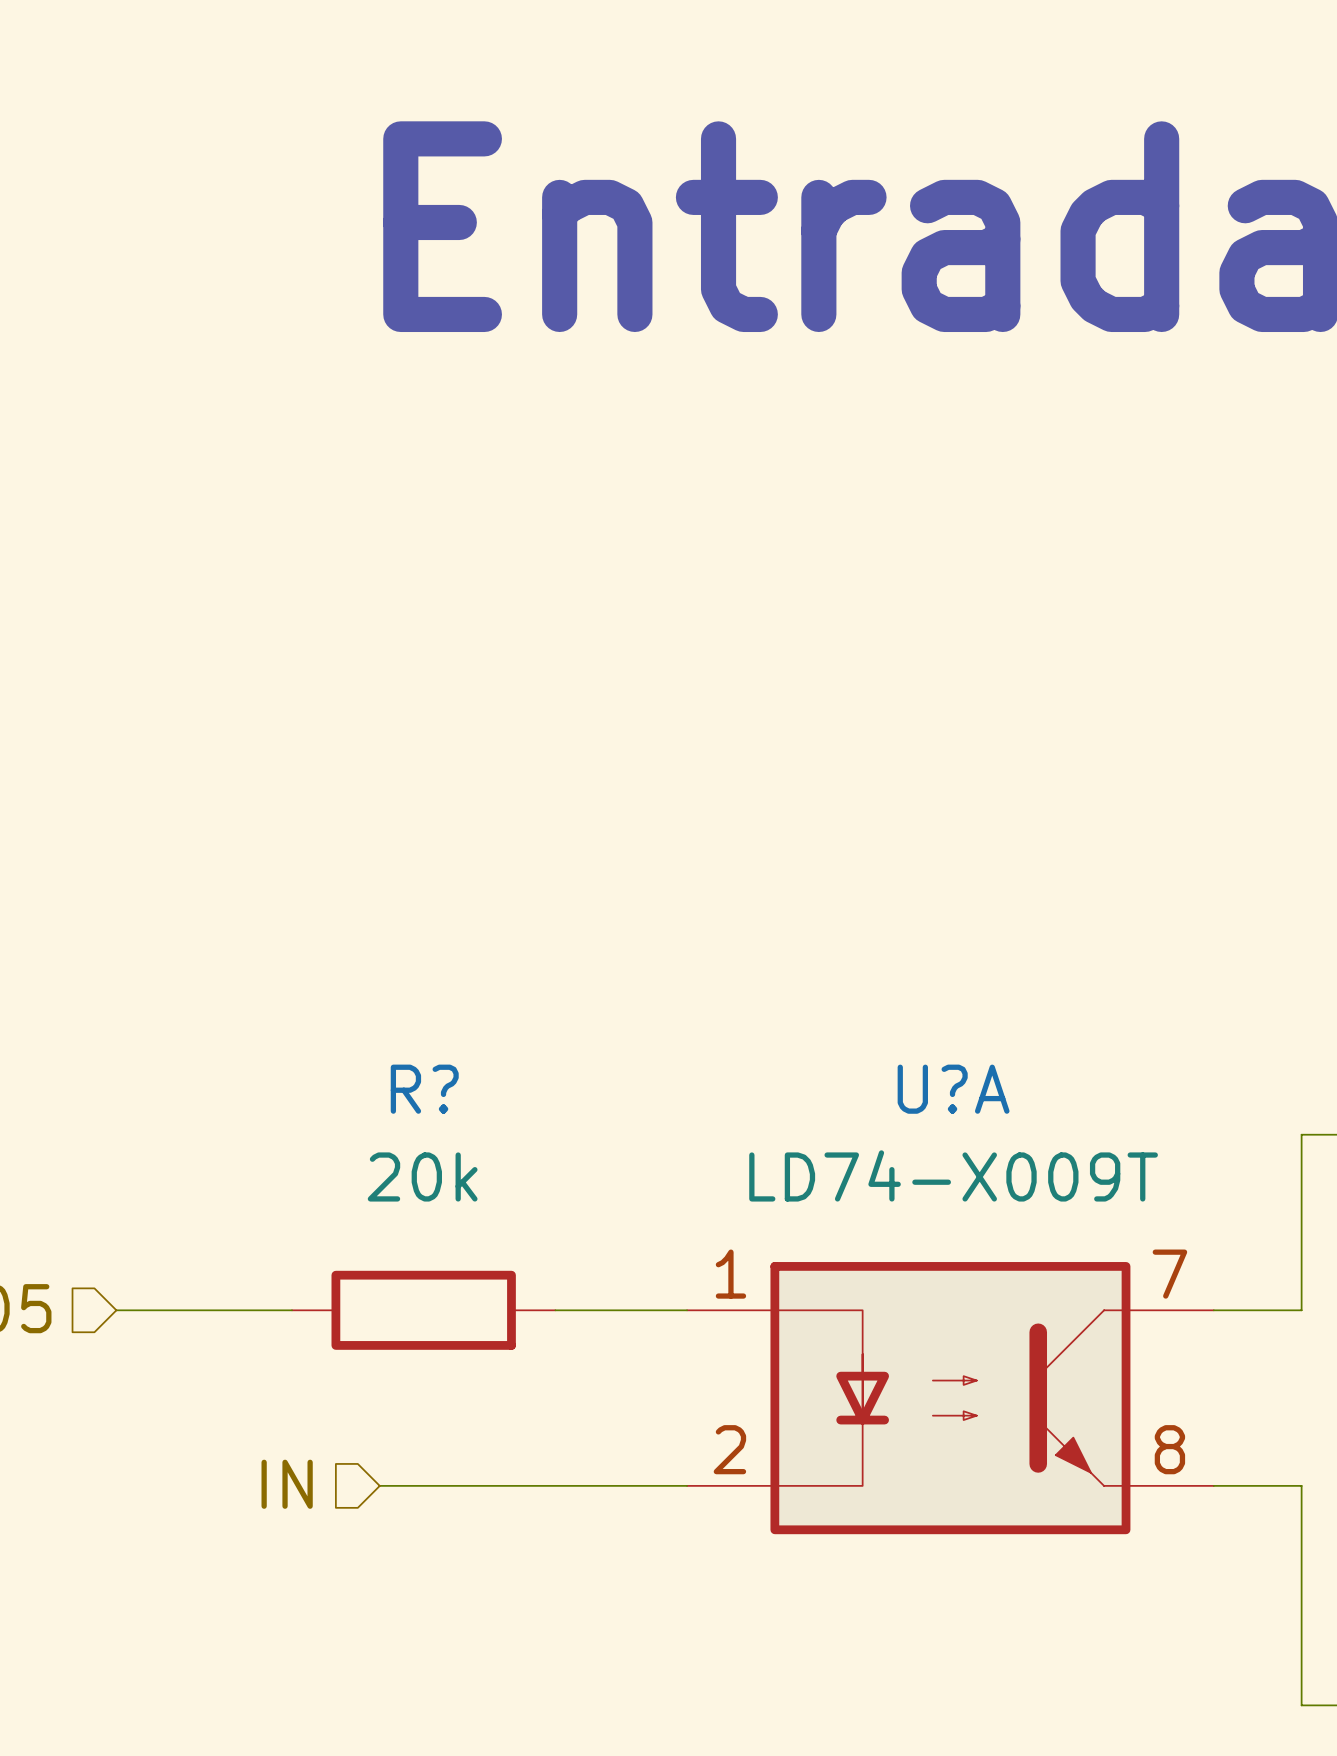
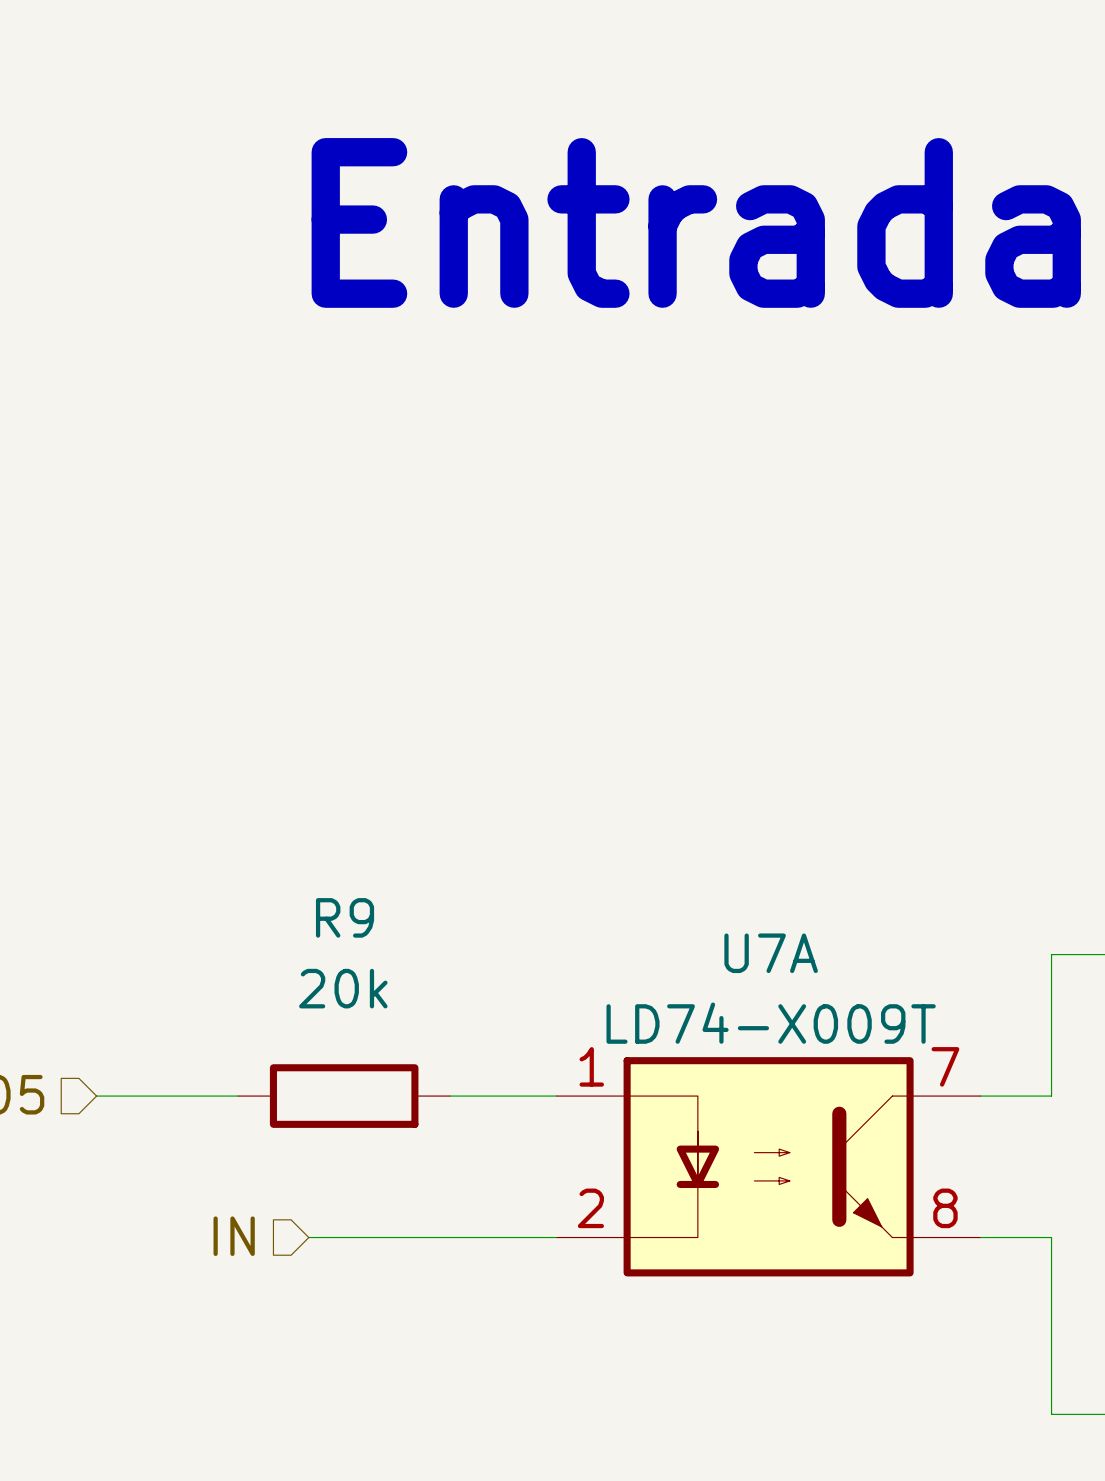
R? name: R? (424, 1089) -> R9 (345, 917)
U?A name: U?A (953, 1089) -> U7A (771, 953)
U?A value position: LD74-X009T (953, 1175) -> LD74-X009T (771, 1023)

